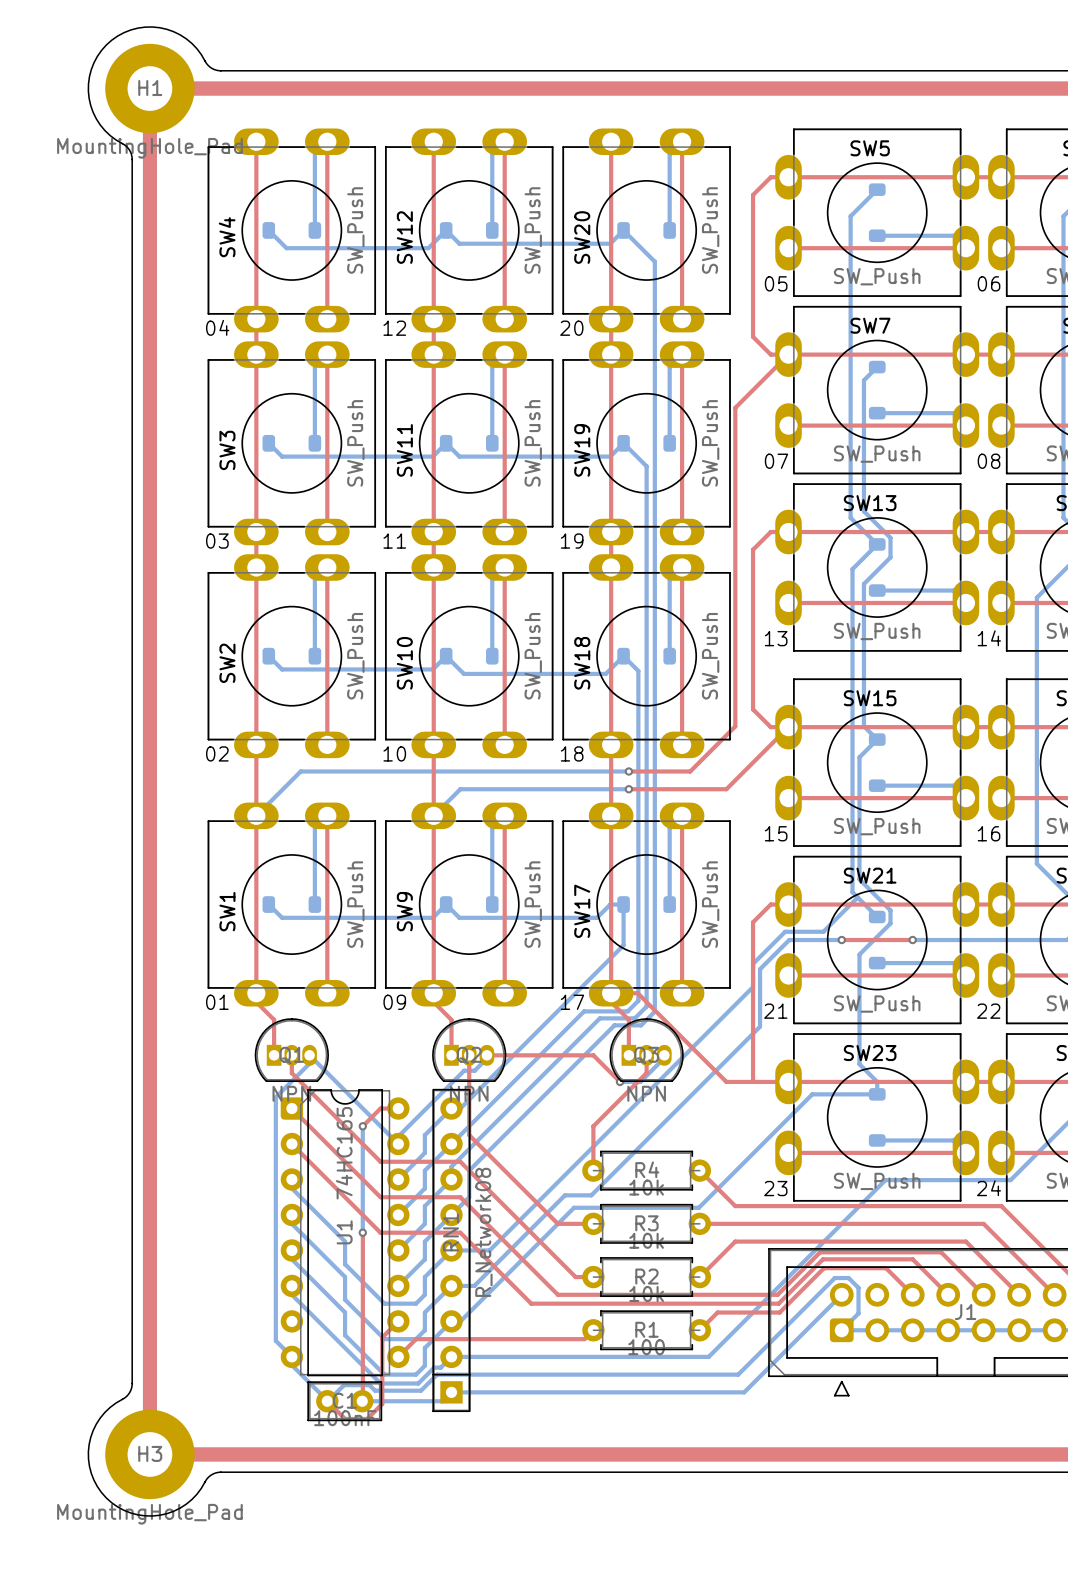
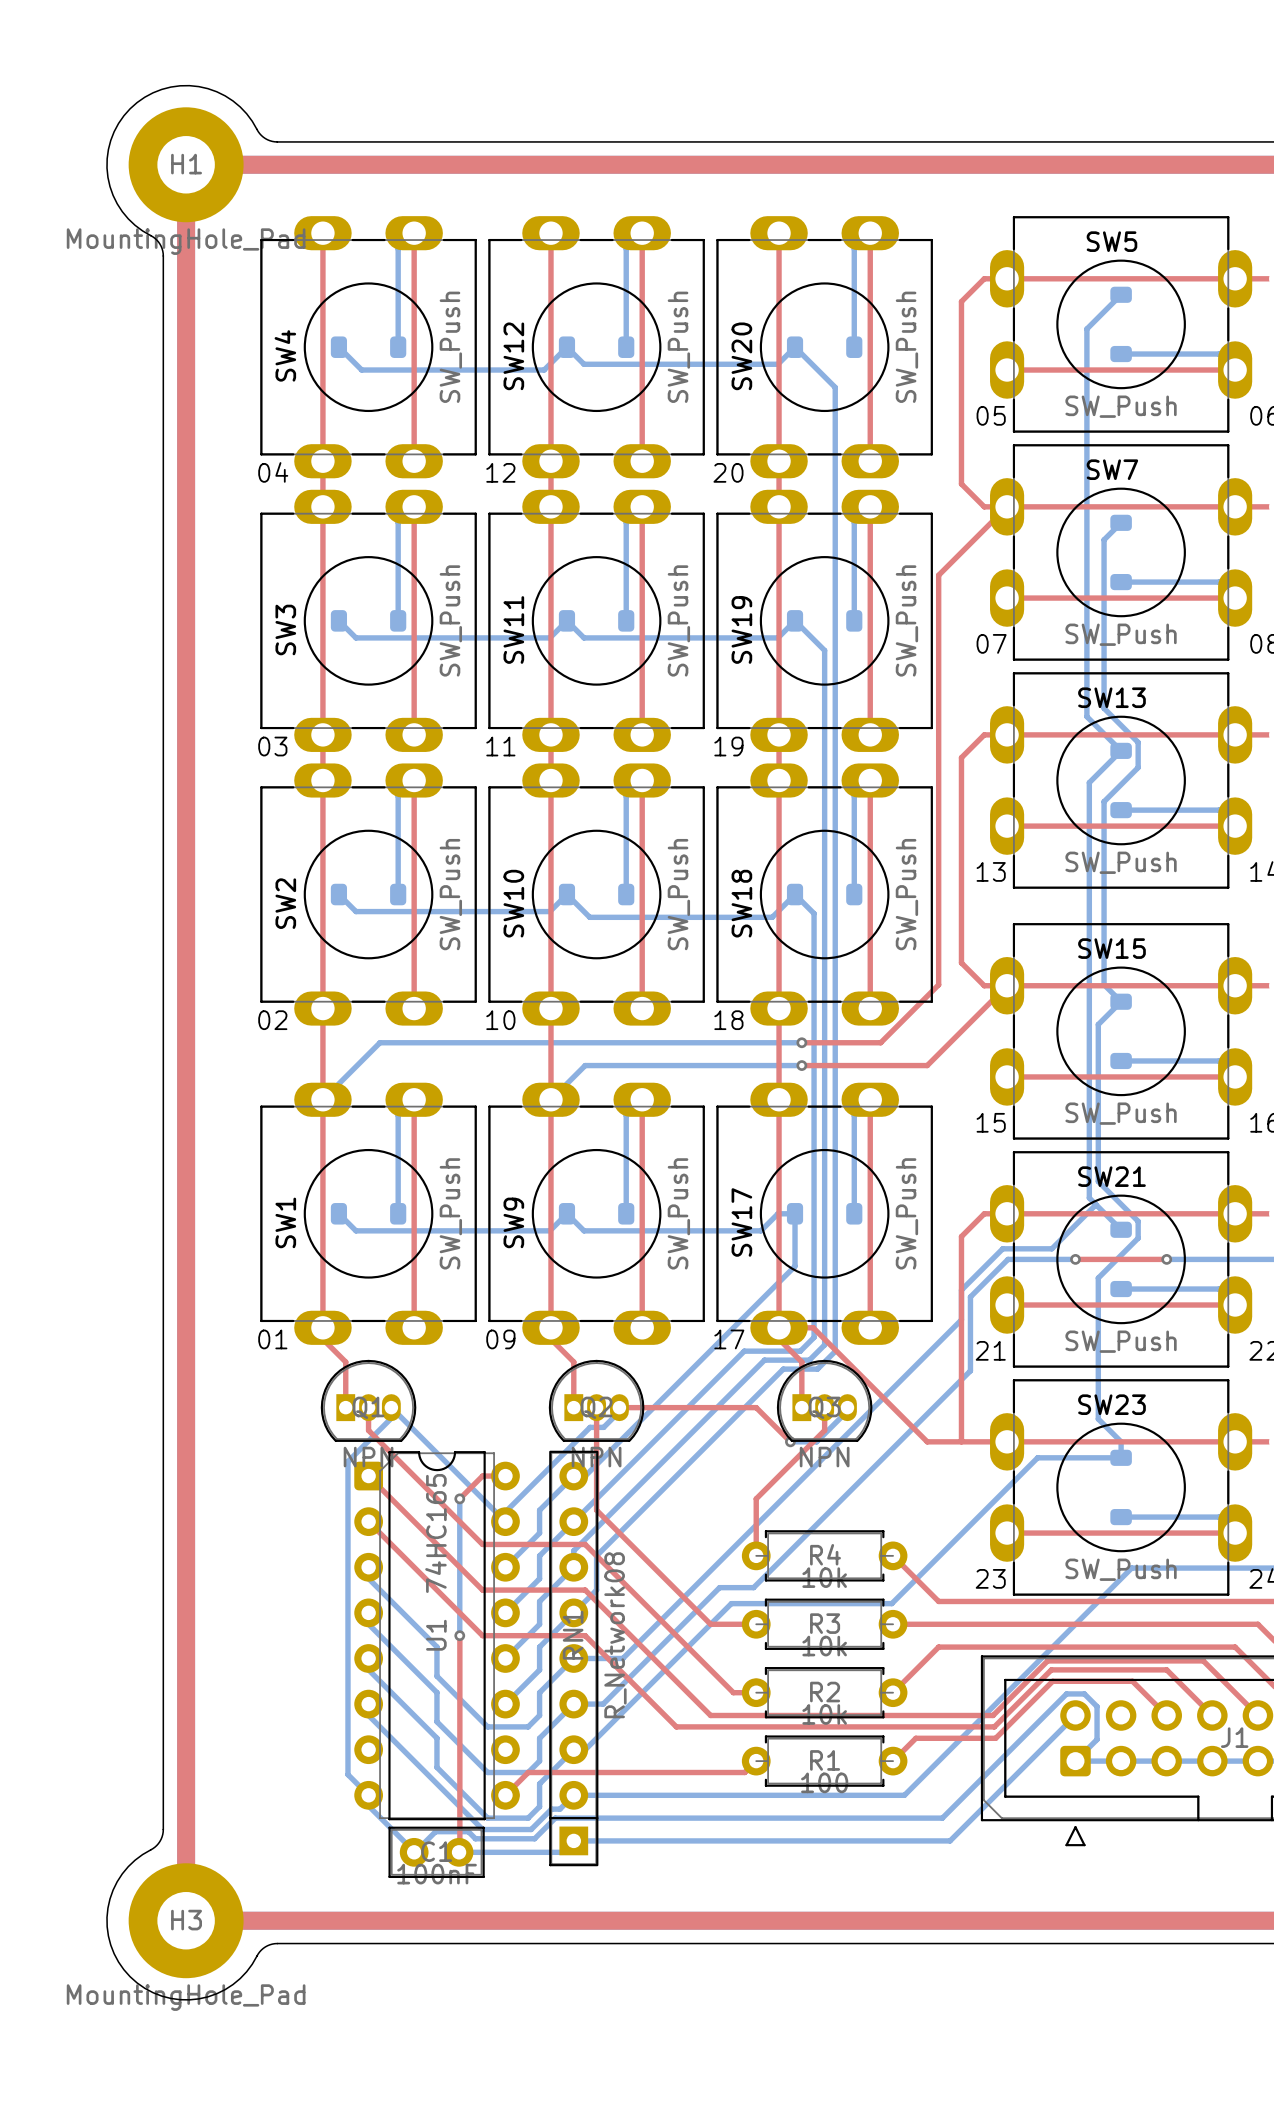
top track: (398, 1321) (382, 1337) (382, 1403) (367, 1418) (345, 1418) (327, 1401) -> none

